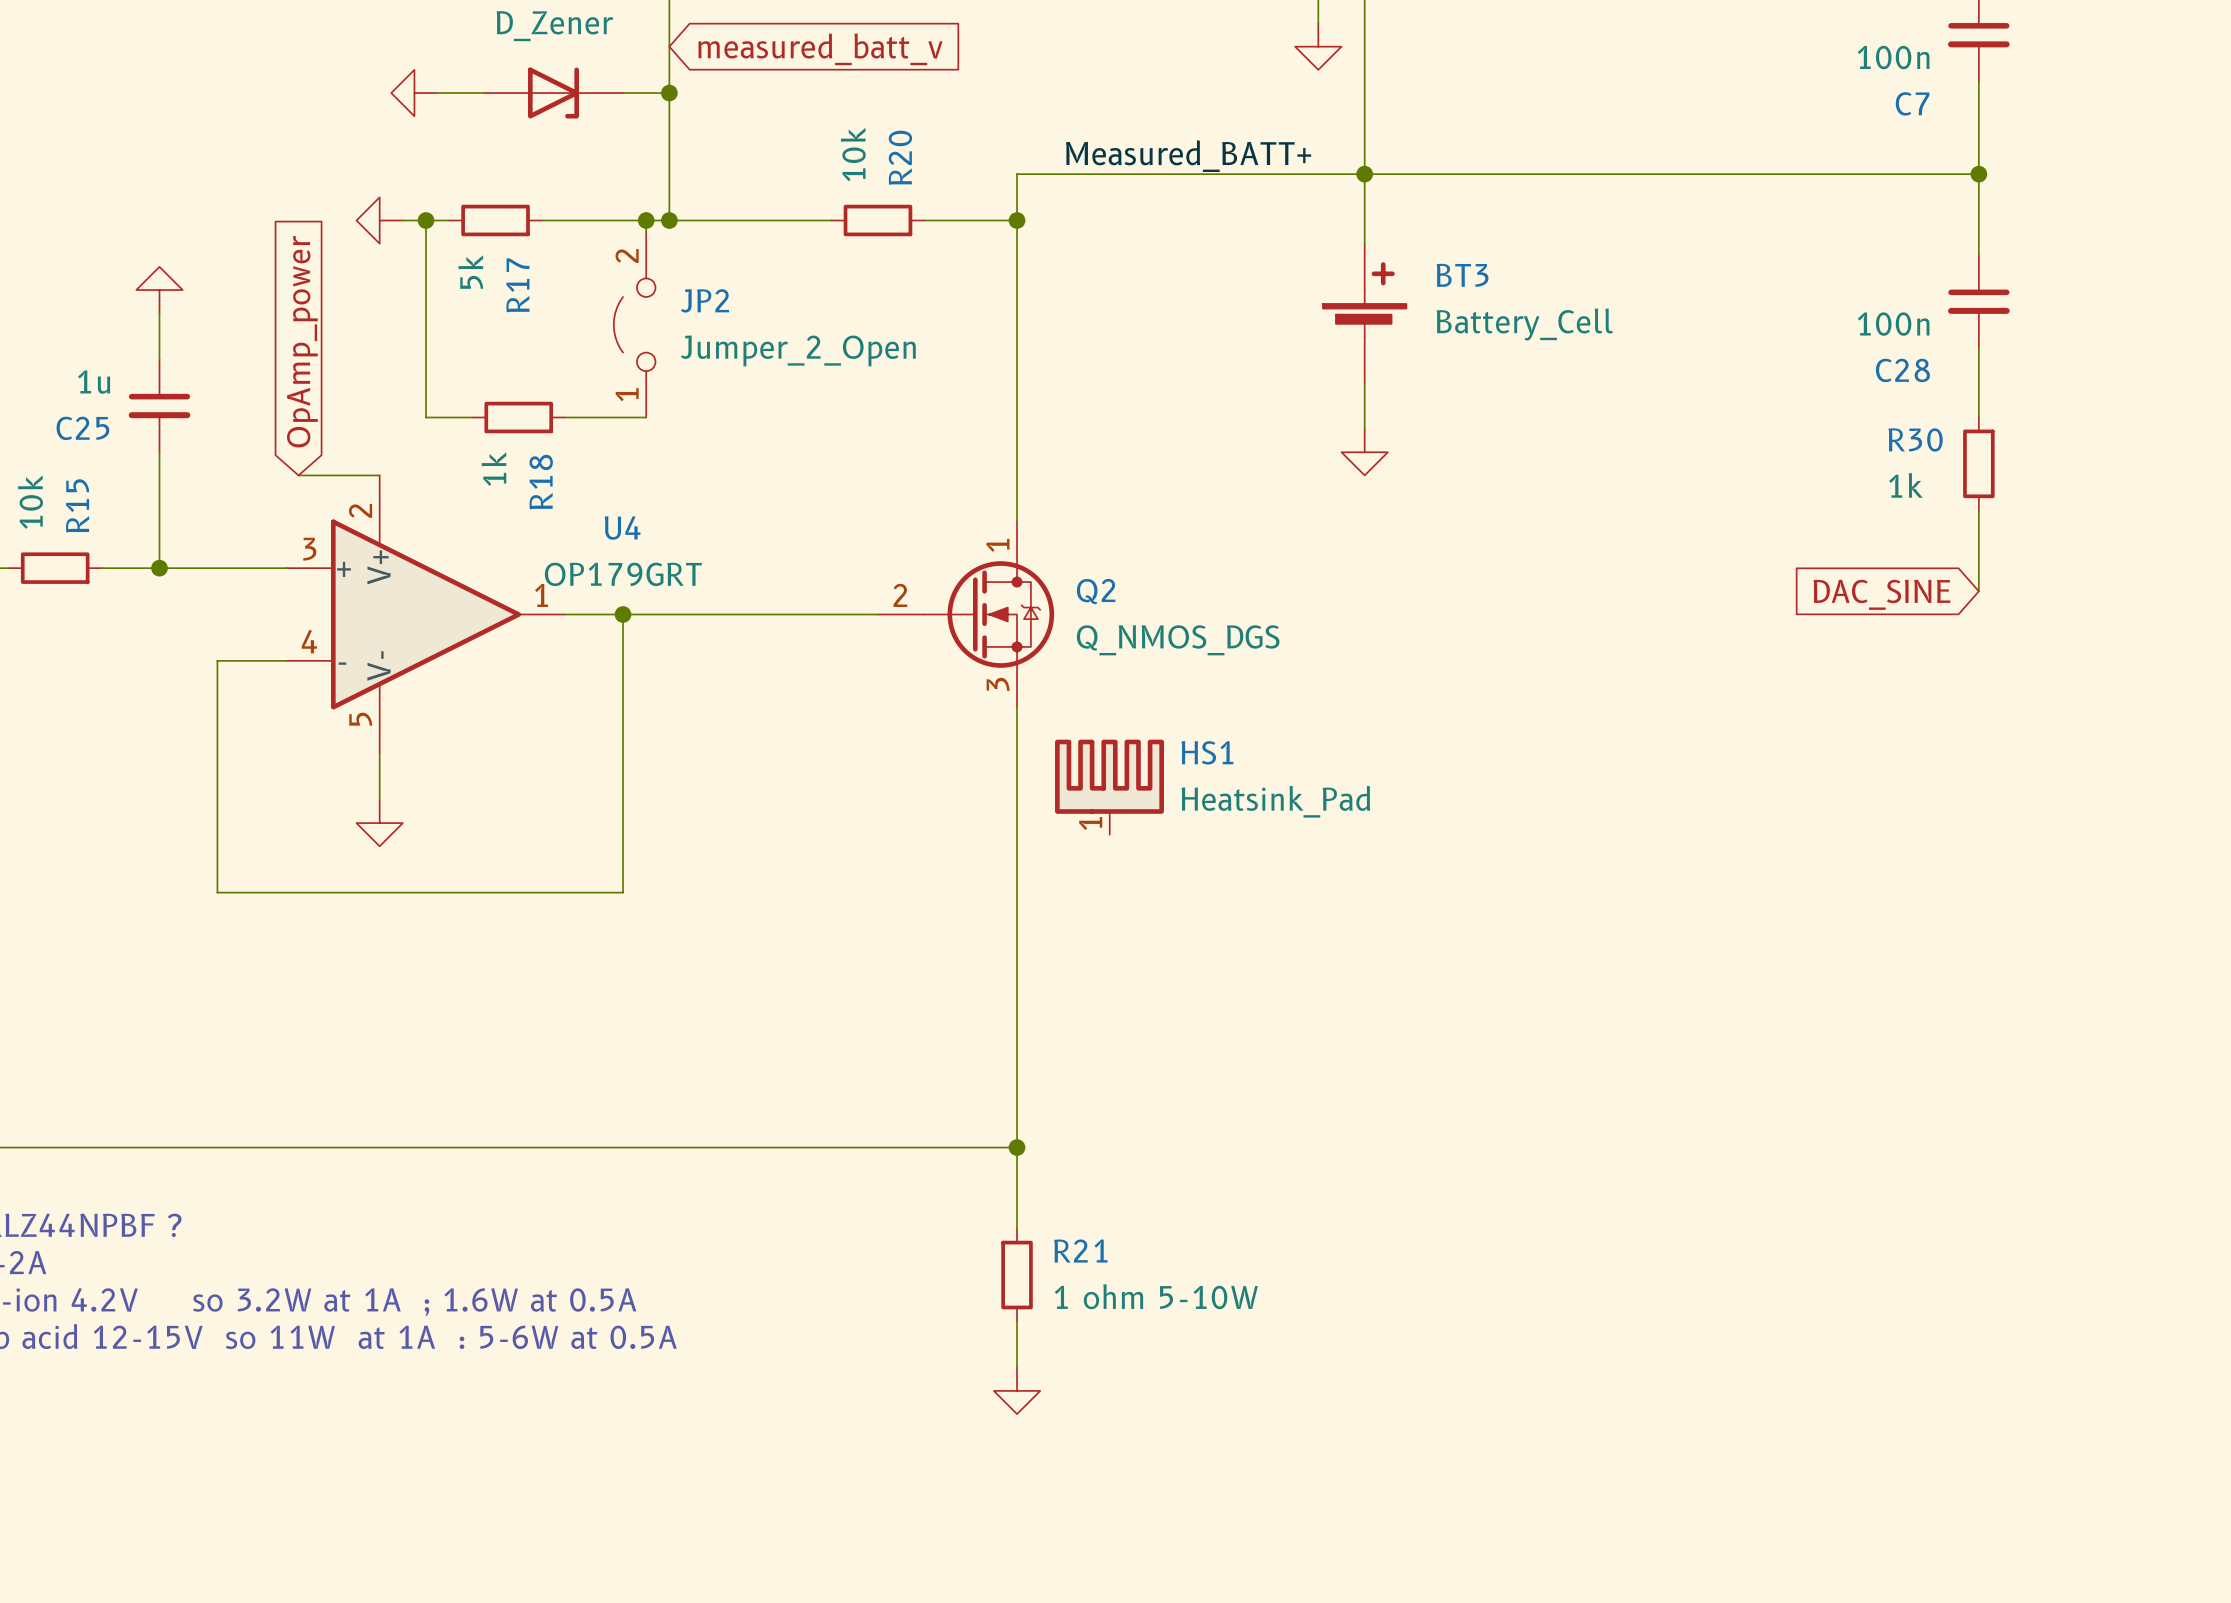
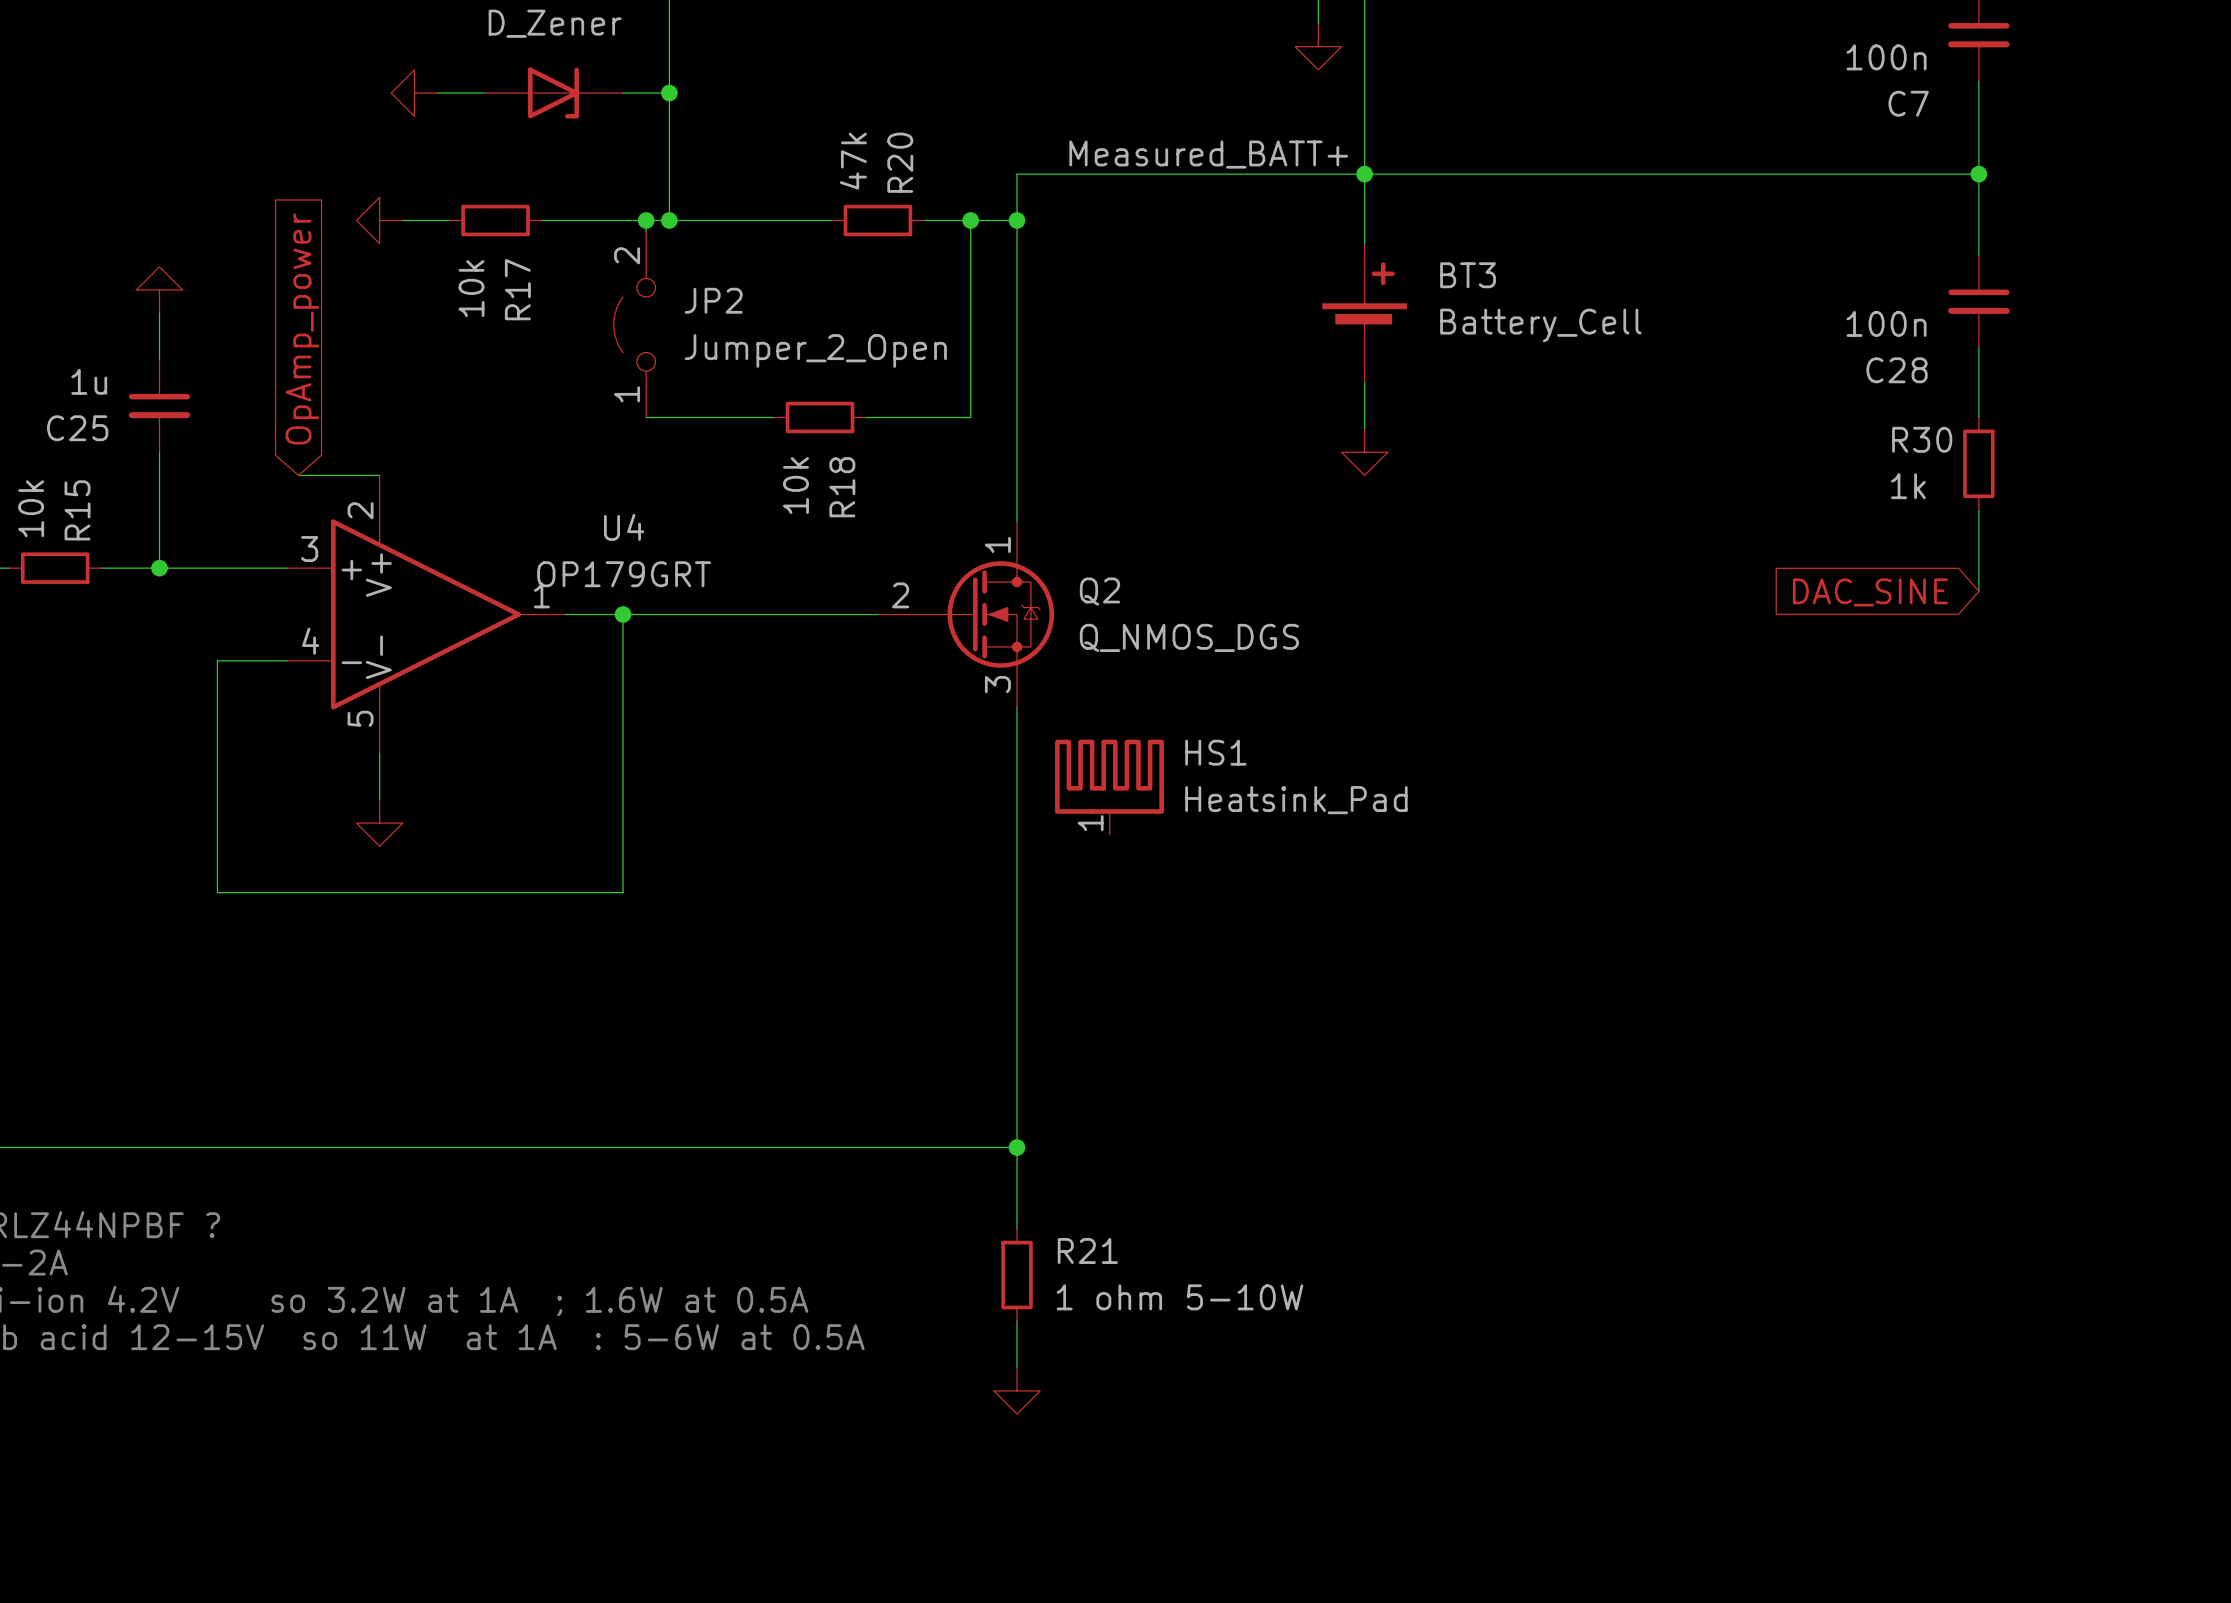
global label: measured_batt_v (820, 49) -> none
R20 value: 10k (853, 154) -> 47k (853, 161)
wire: (426, 220) (426, 417) (472, 417) -> none
junction: (426, 220) -> none
wire: none -> (970, 220) (970, 417) (866, 417)
junction: none -> (970, 220)
R17 value: 5k (470, 272) -> 10k (471, 288)
R18 position: (518, 417) -> (820, 417)
wire: (565, 417) (646, 417) -> (773, 417) (646, 417)
R18 value: 1k (493, 469) -> 10k (795, 485)

